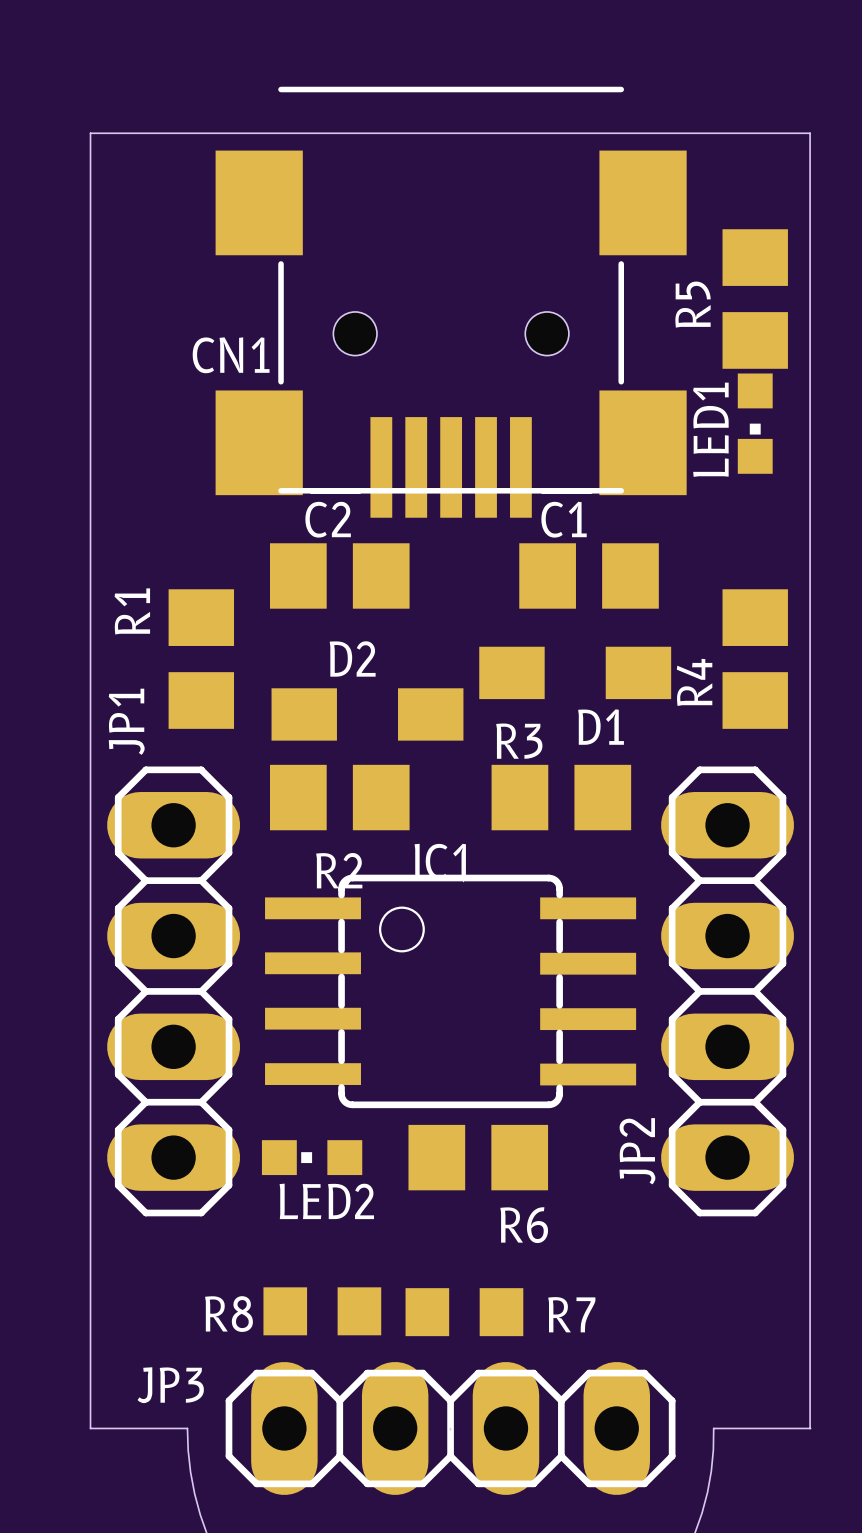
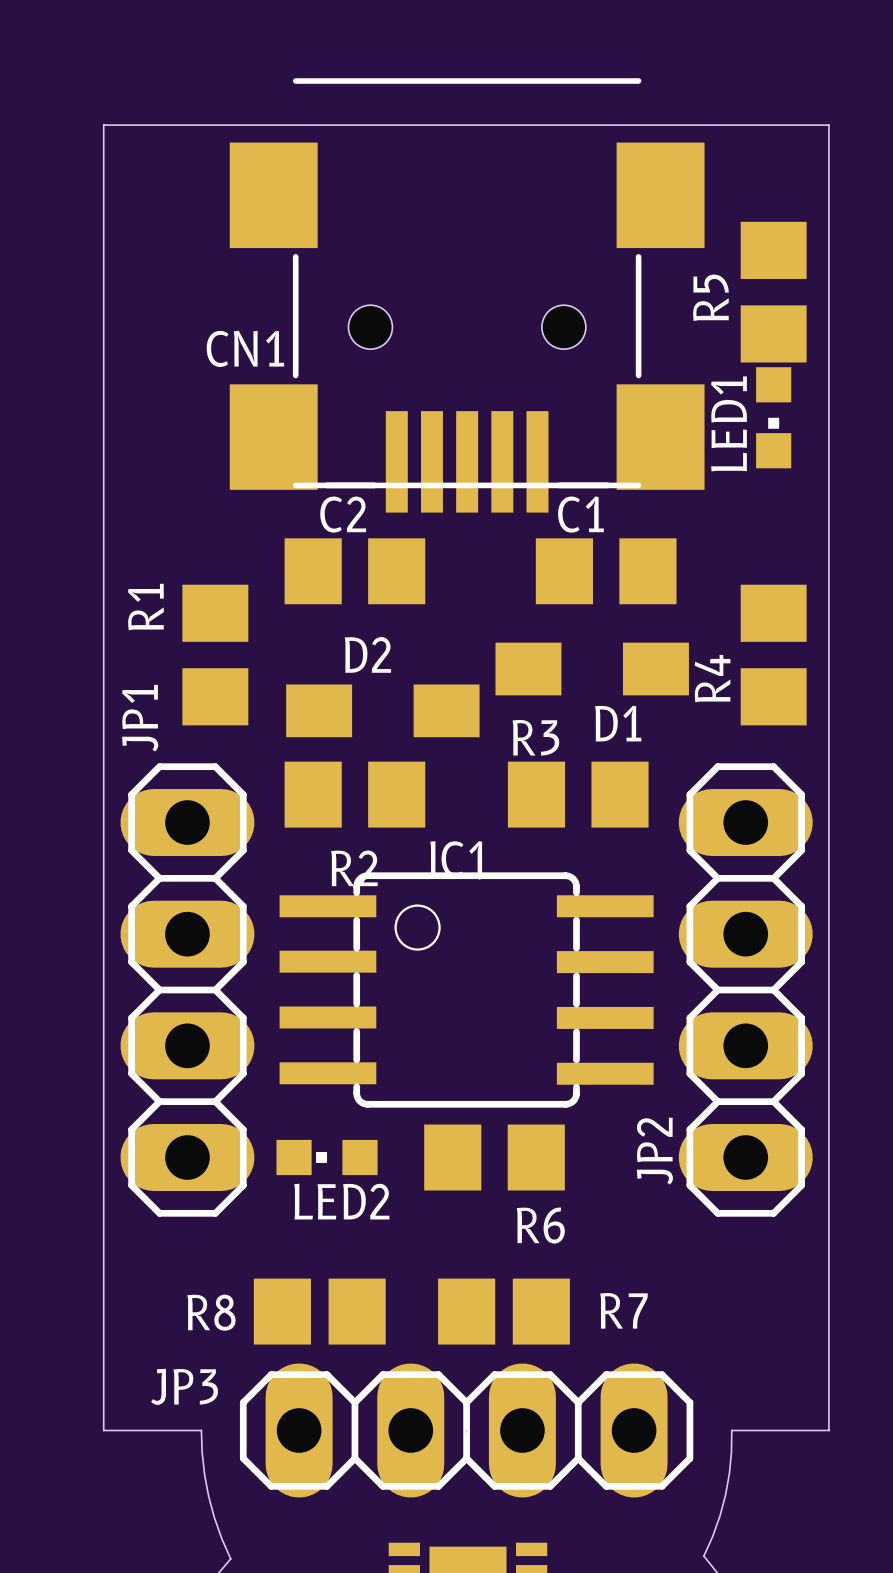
R8 footprint: [263, 1287, 382, 1336] -> [253, 1278, 386, 1345]
R7 footprint: [405, 1288, 524, 1337] -> [438, 1278, 570, 1345]
R8 name position: R8 (228, 1314) -> R8 (211, 1312)
R7 name position: R7 (571, 1314) -> R7 (623, 1310)

